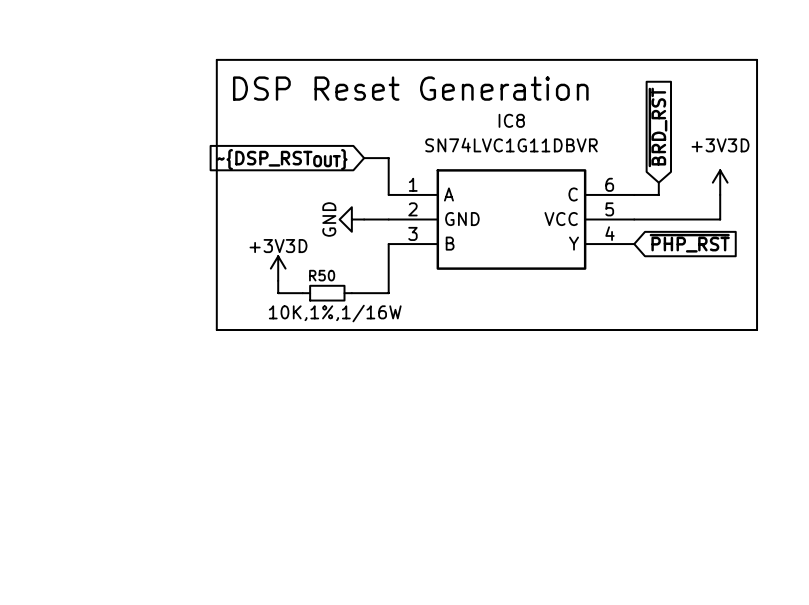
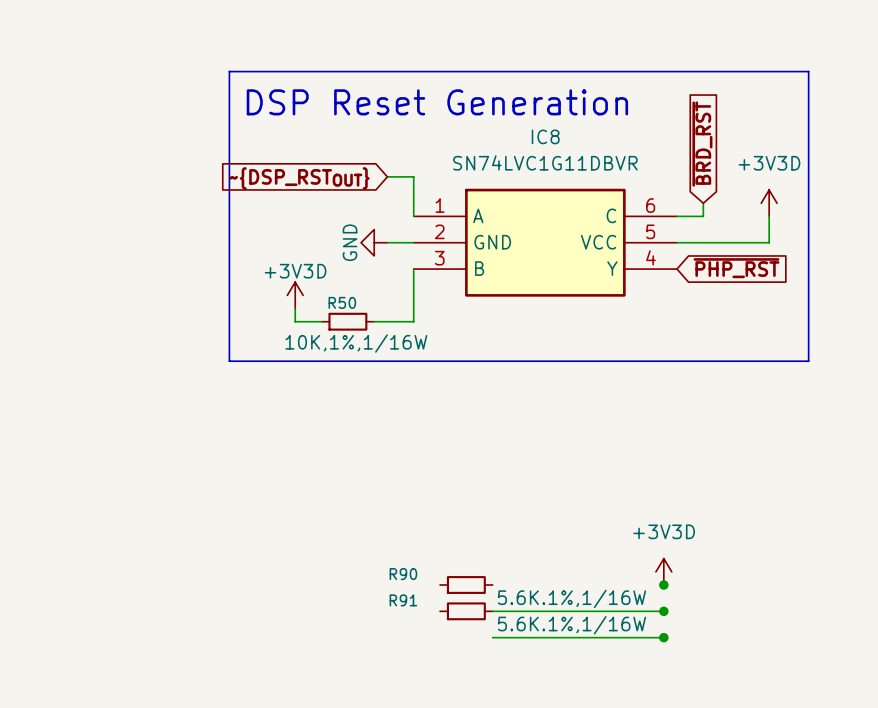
power symbol: none -> +3V3D (663, 571)
R90: none -> 5.6K.1%,1/16W (466, 585)
junction: none -> (663, 585)
R91: none -> 5.6K.1%,1/16W (466, 611)
wire: none -> (492, 611) (663, 611)
junction: none -> (663, 611)
wire: none -> (492, 637) (663, 637)
junction: none -> (663, 637)

